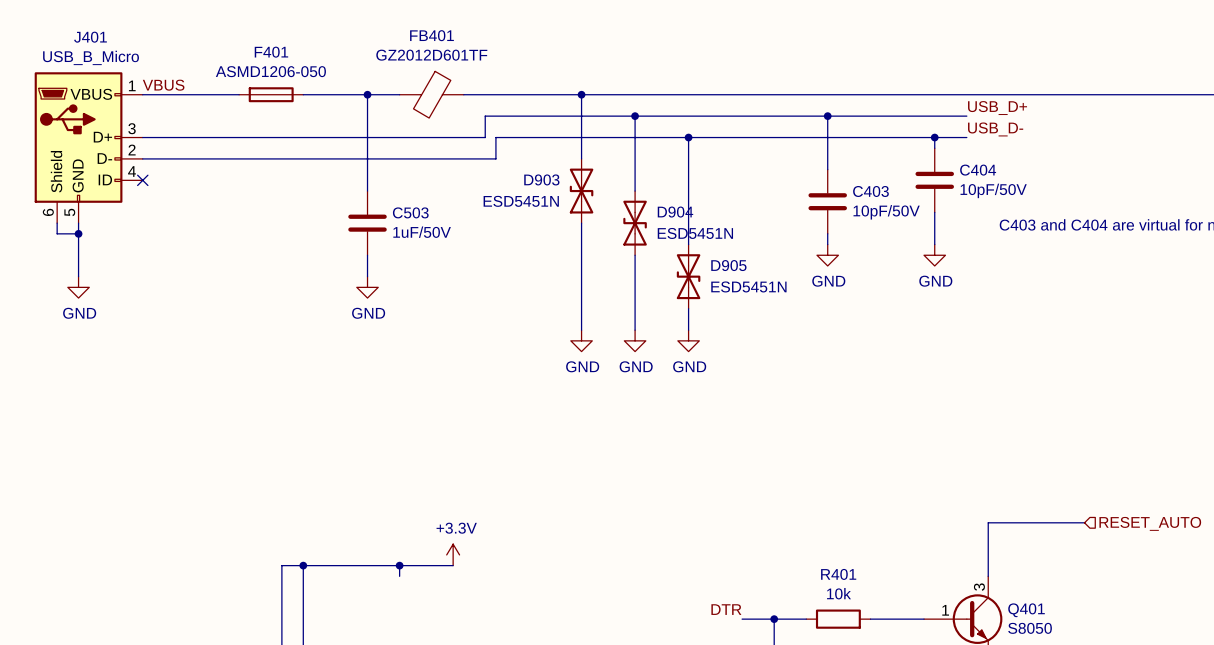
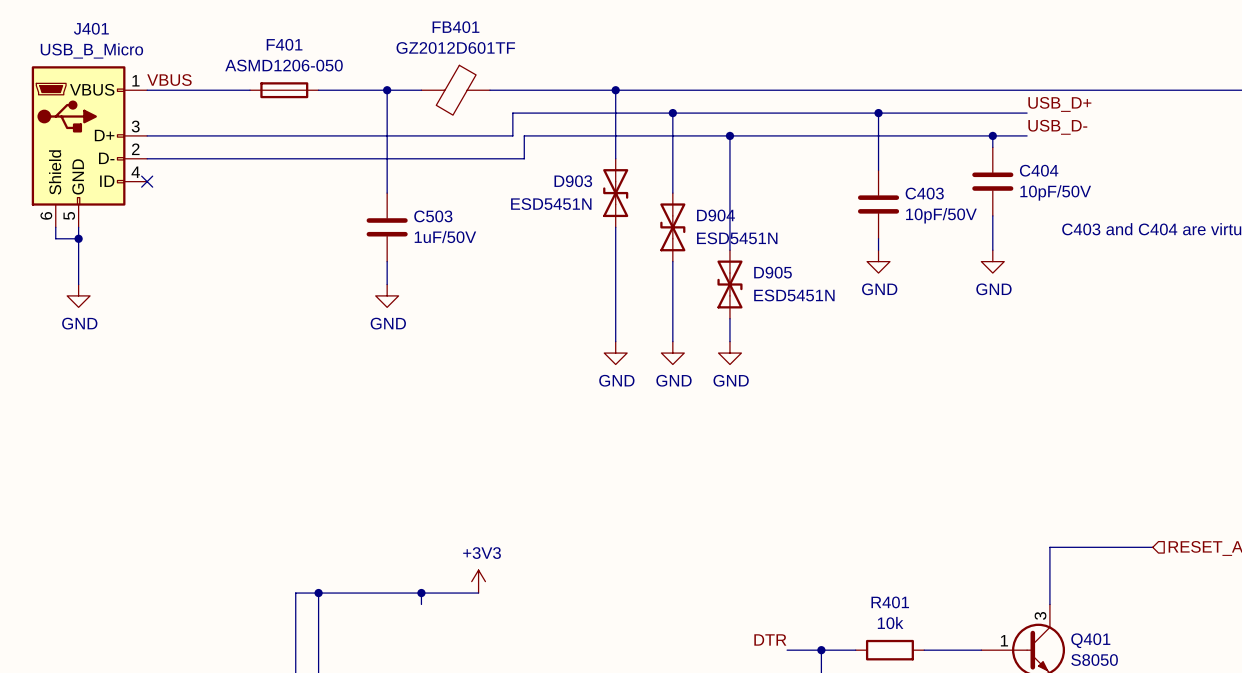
power symbol: +3.3V (453, 554) -> +3V3 (478, 581)

